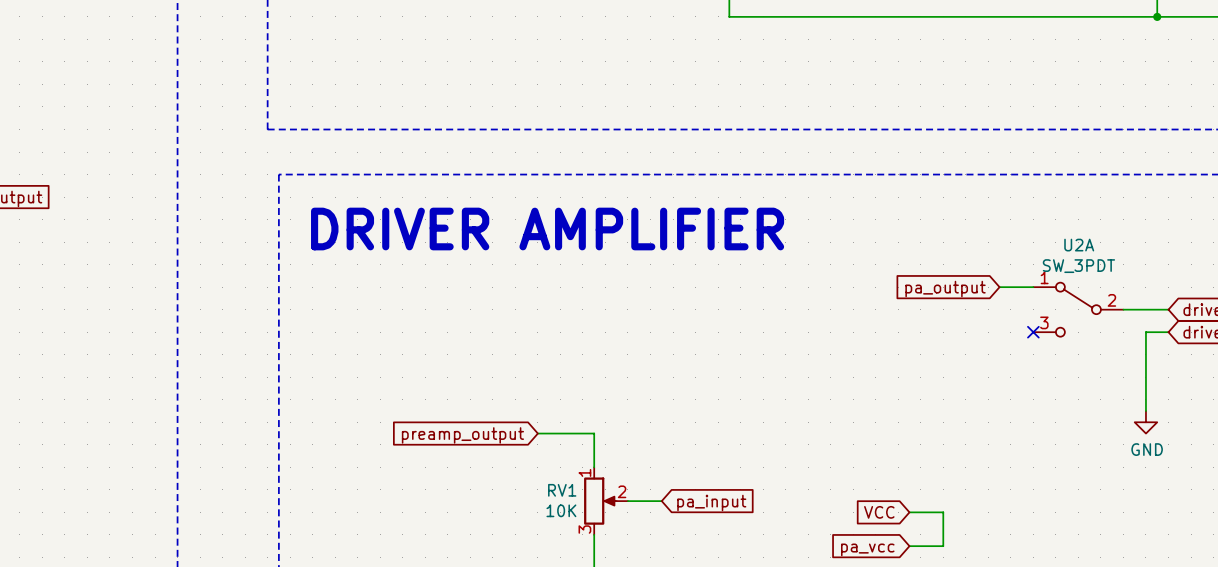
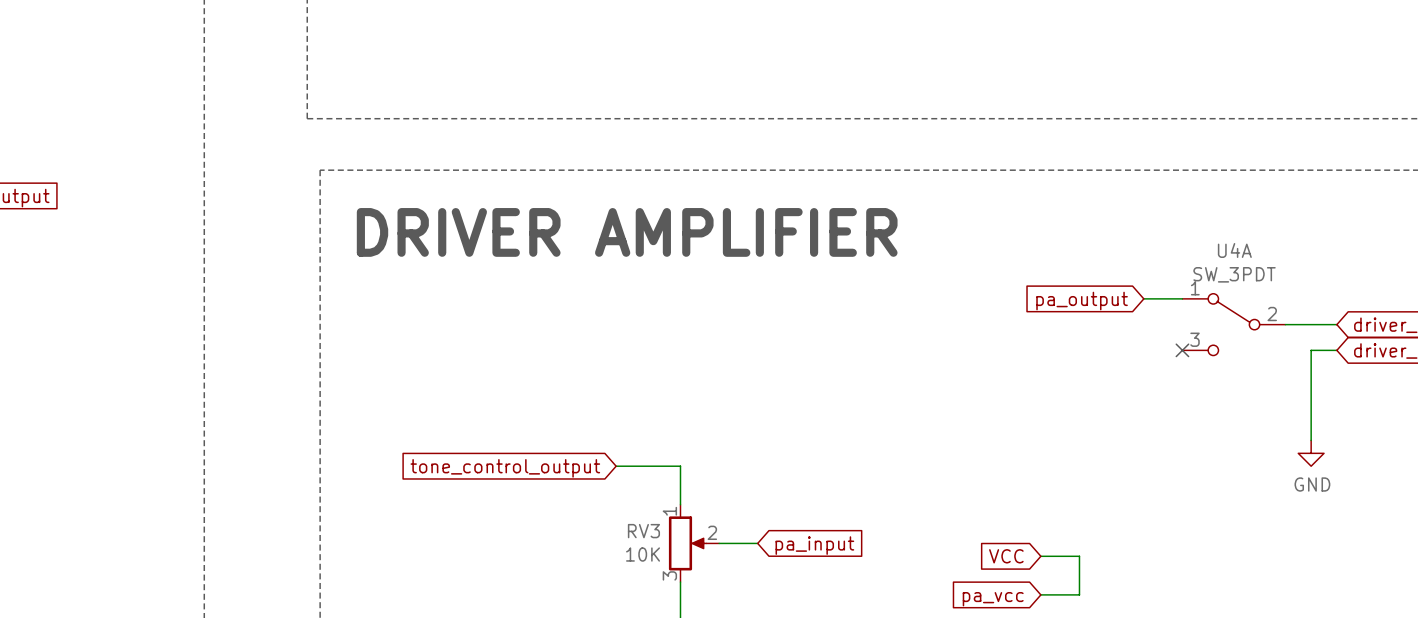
U2A name: U2A (1079, 245) -> U4A (1234, 250)
global label: preamp_output (462, 435) -> tone_control_output (505, 468)
RV1 name: RV1 (562, 490) -> RV3 (643, 531)

